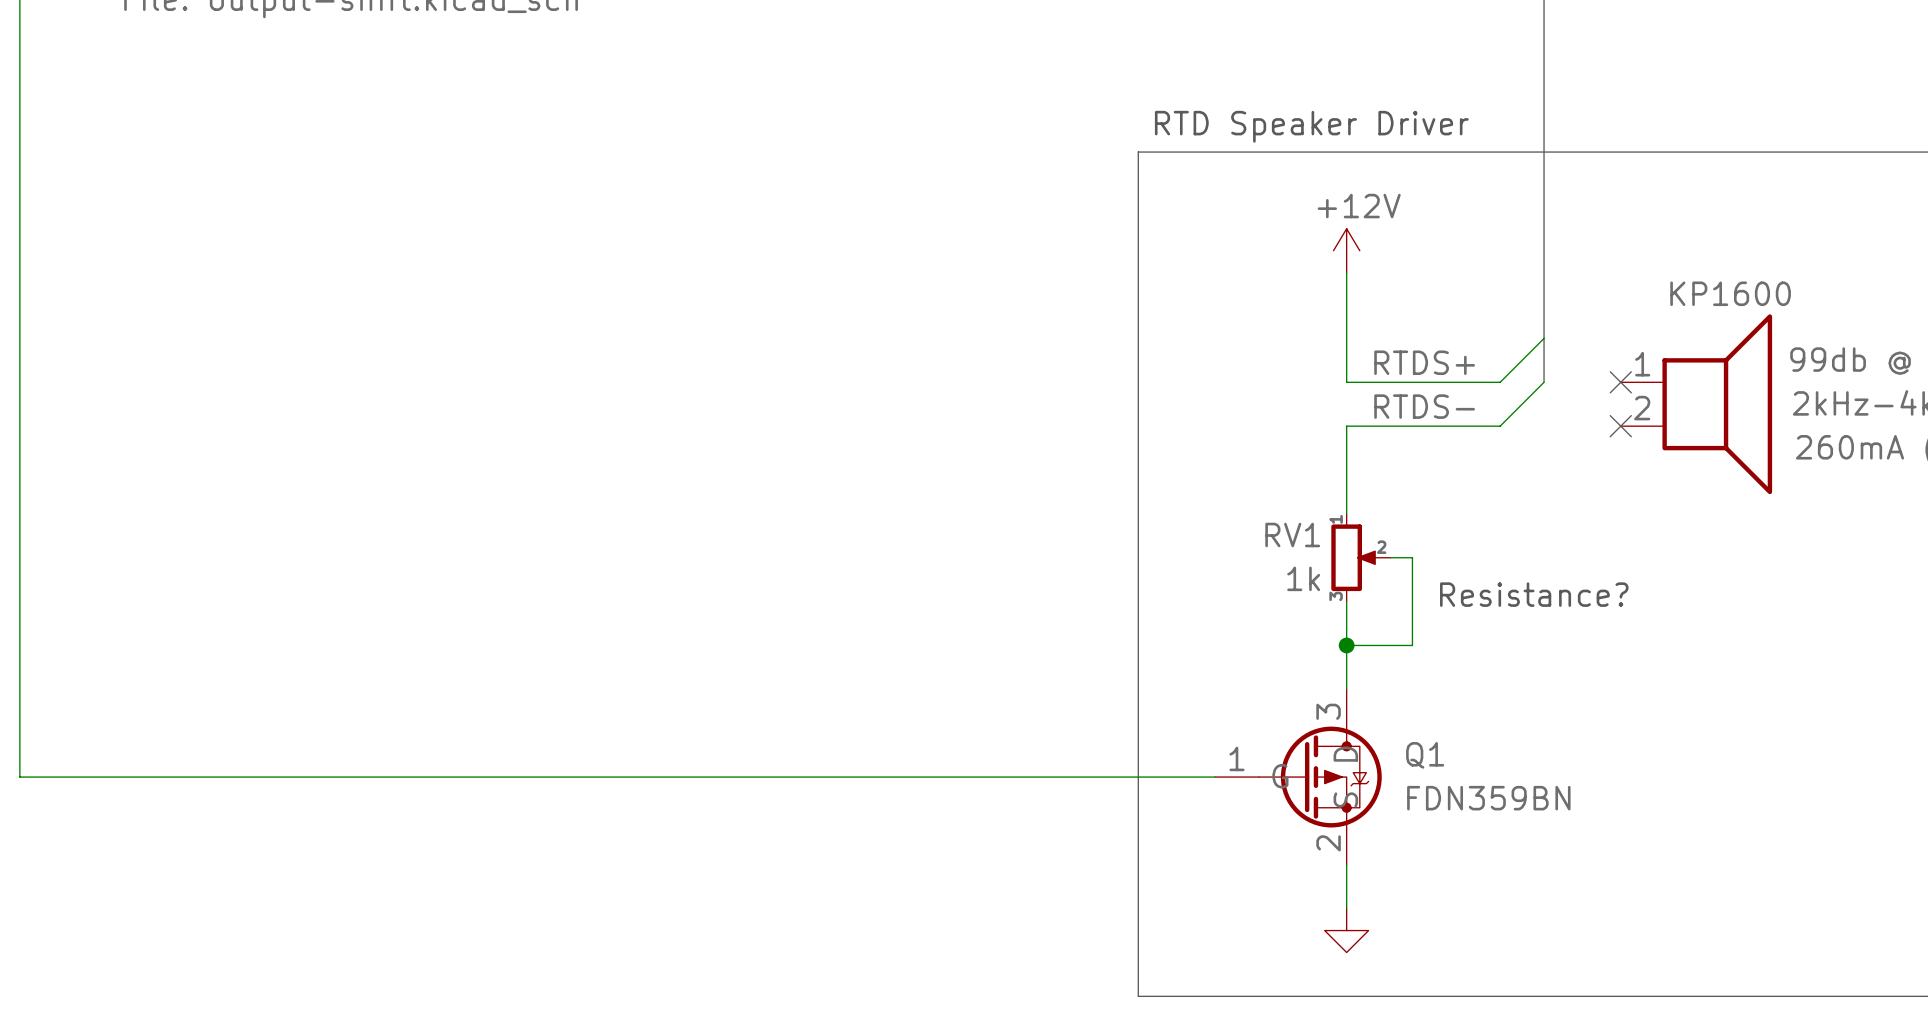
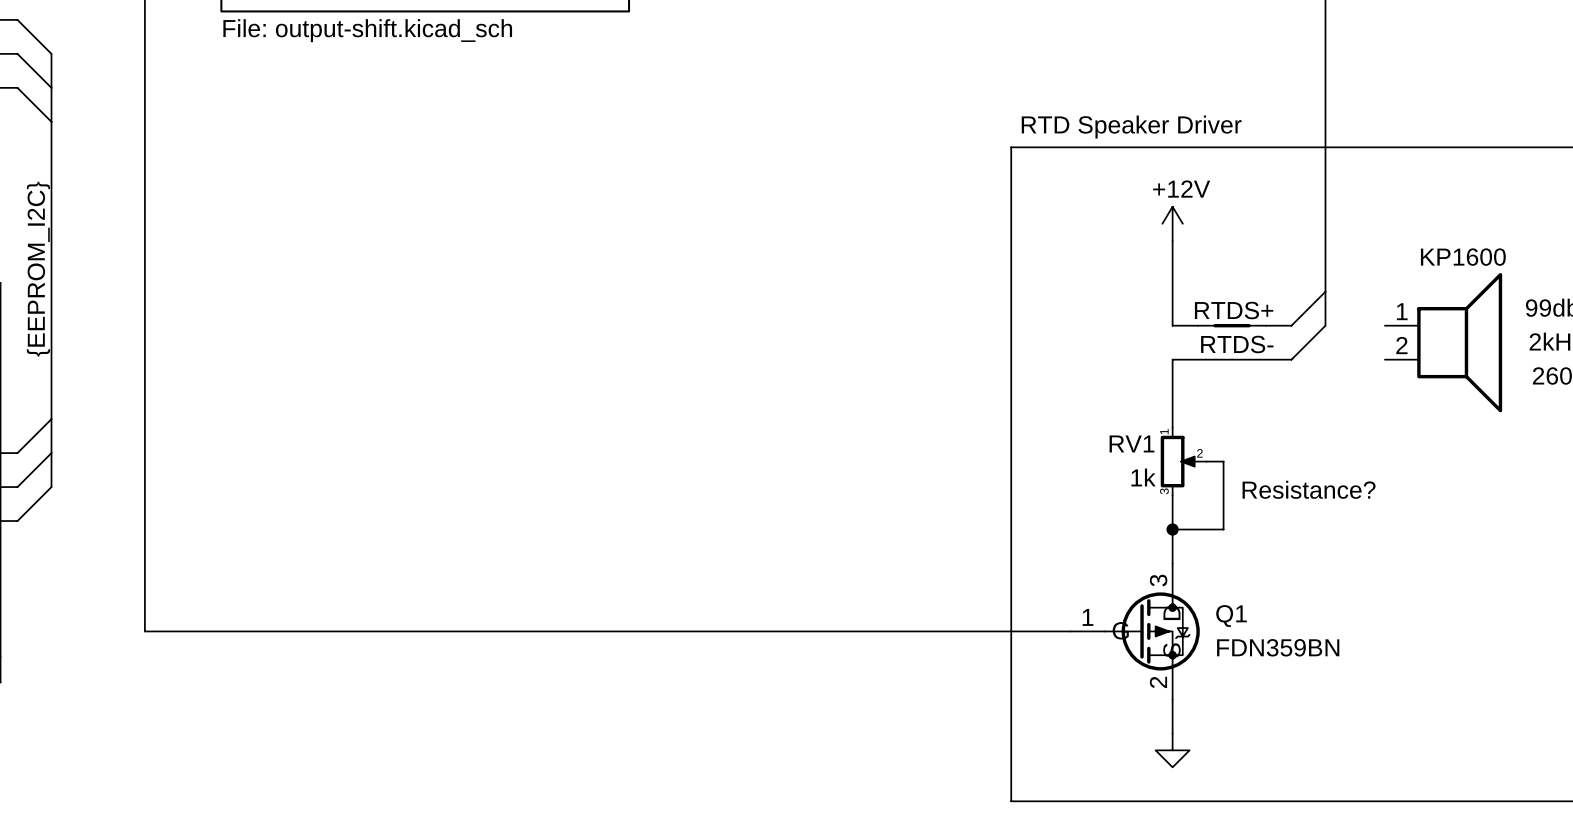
label position: RTDS+ (1424, 362) -> RTDS+ (1234, 310)
part: none -> (1232, 325)
no-connect mark: (1620, 382) -> none
label position: RTDS- (1424, 406) -> RTDS- (1237, 344)
no-connect mark: (1620, 426) -> none

